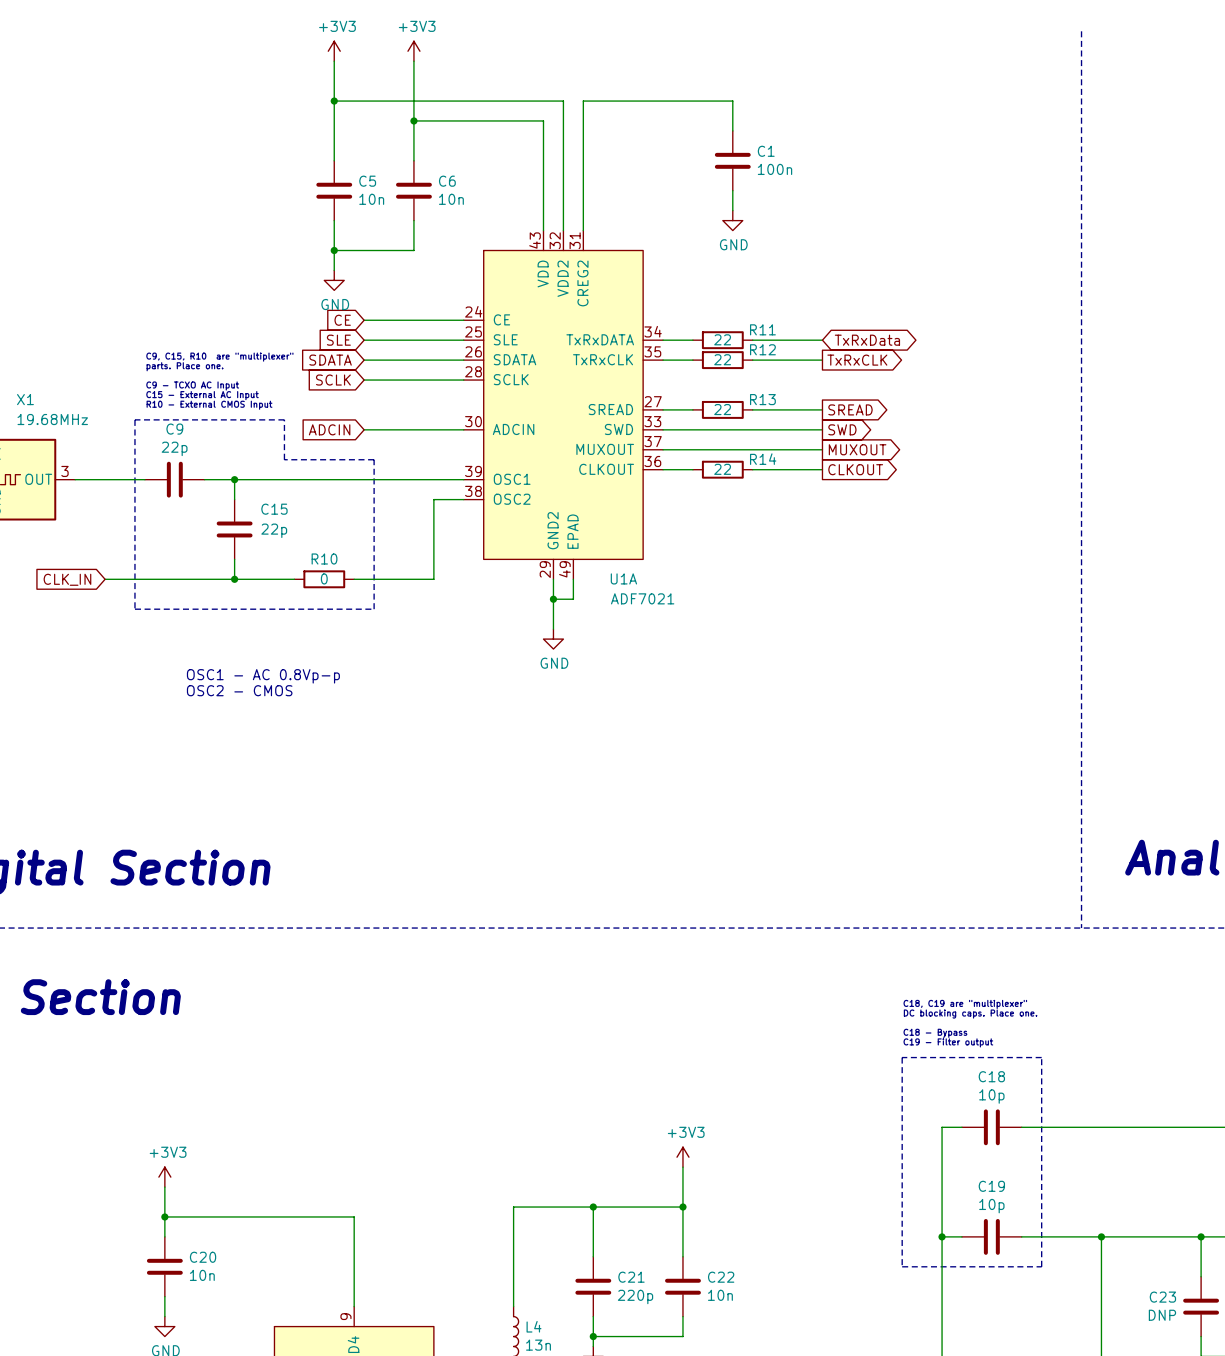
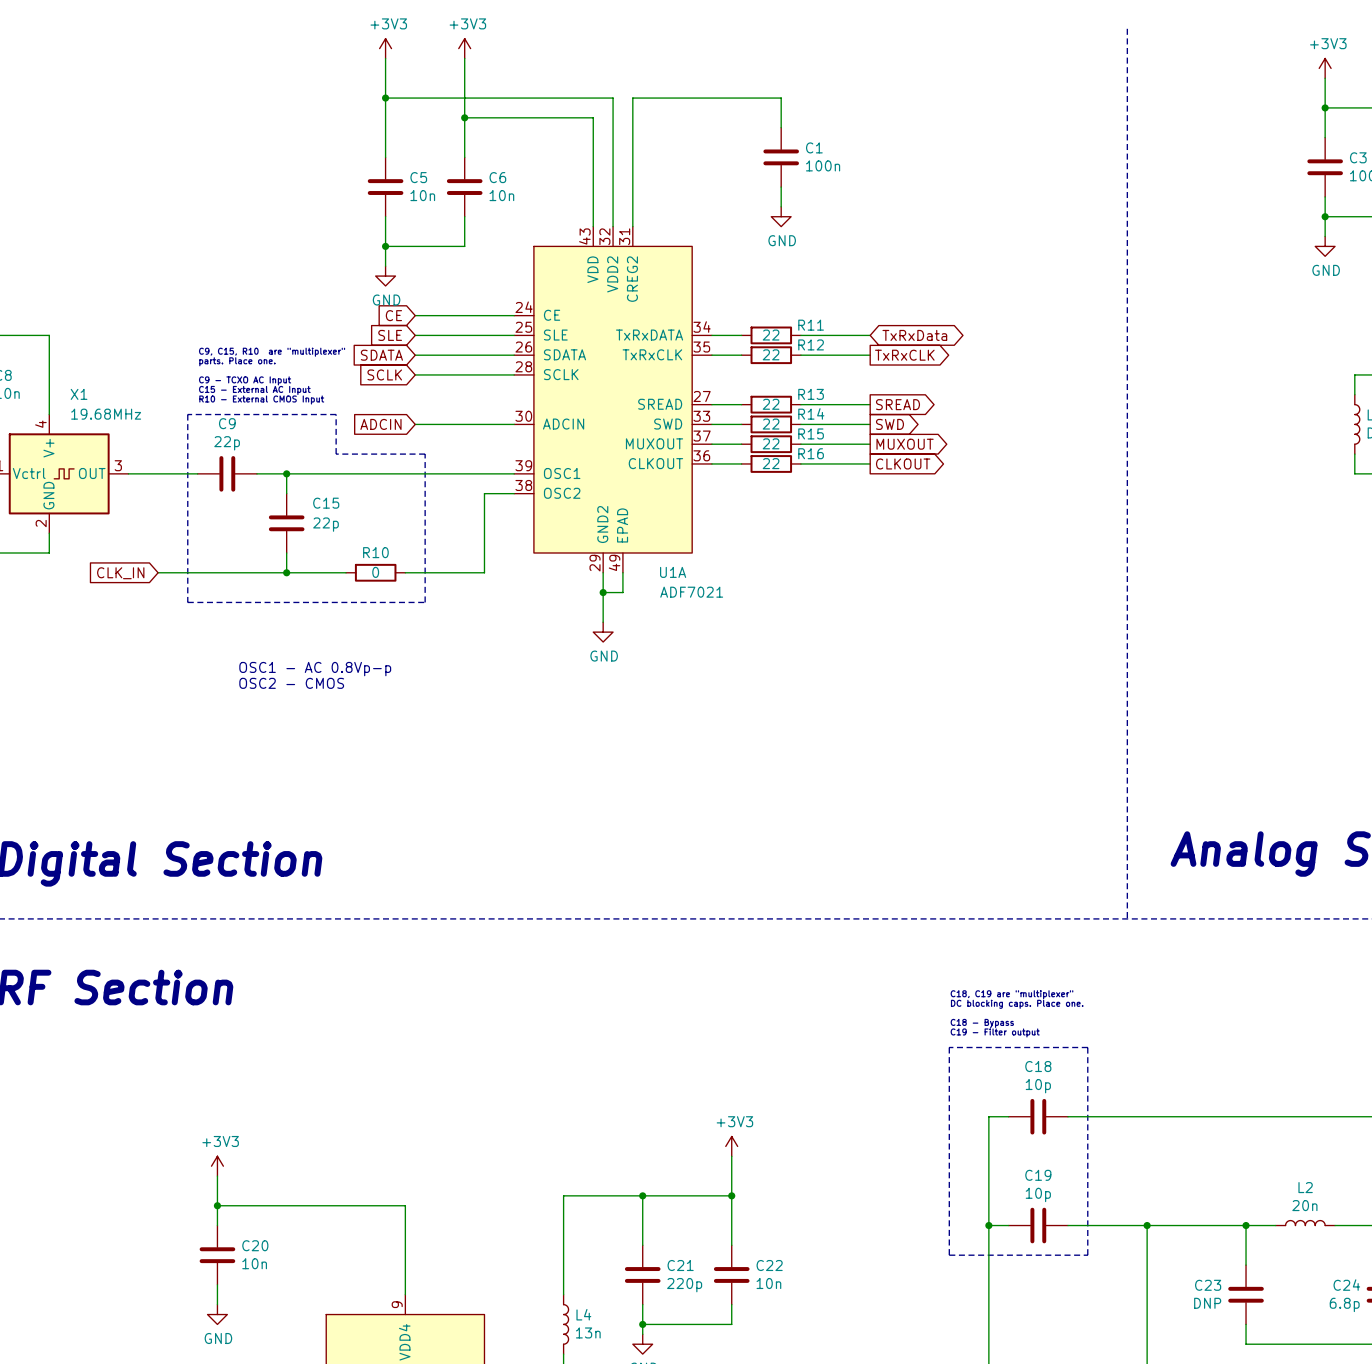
wire: (692, 429) (752, 429) -> none
R14: none -> 22 (771, 424)
wire: (692, 449) (752, 449) -> none
R15: none -> 22 (771, 444)
R14 name: R14 (763, 459) -> R16 (811, 453)

